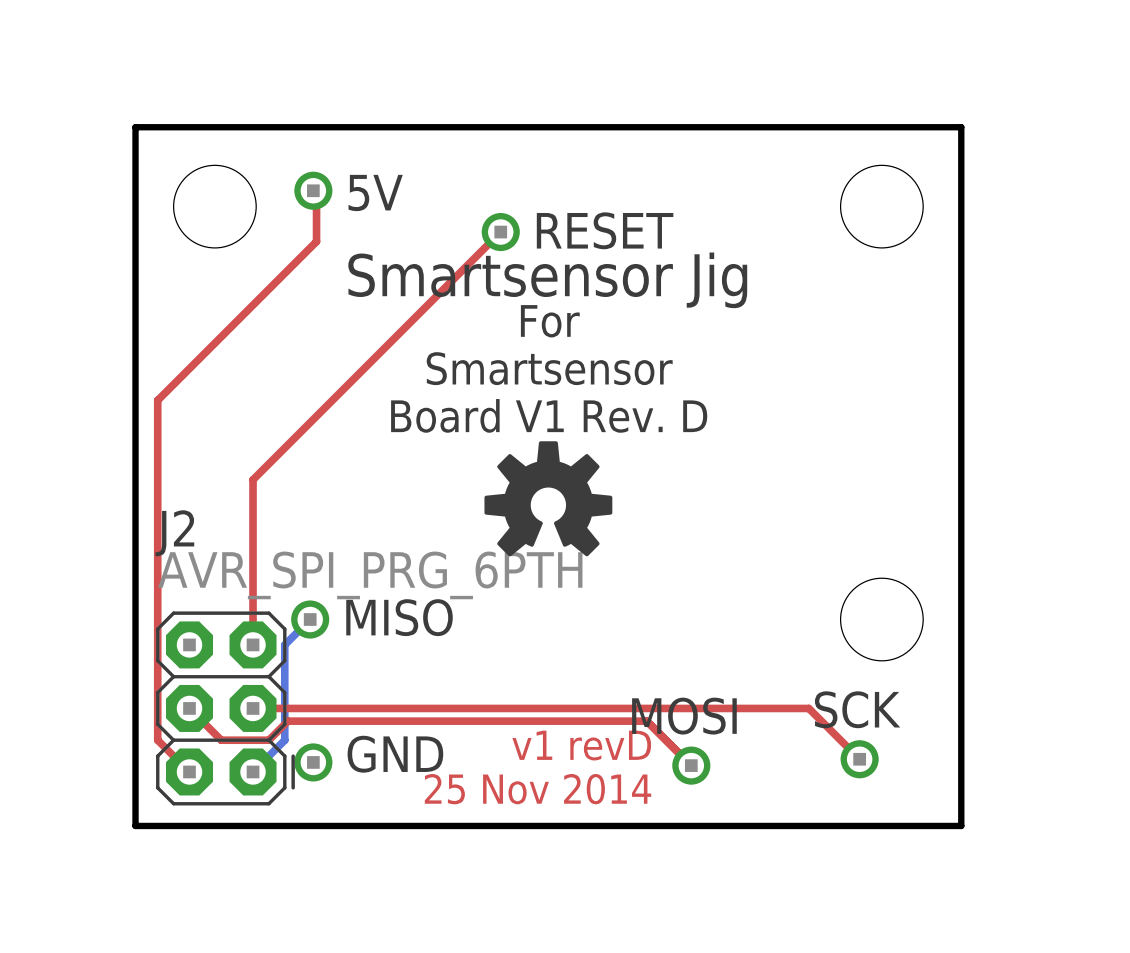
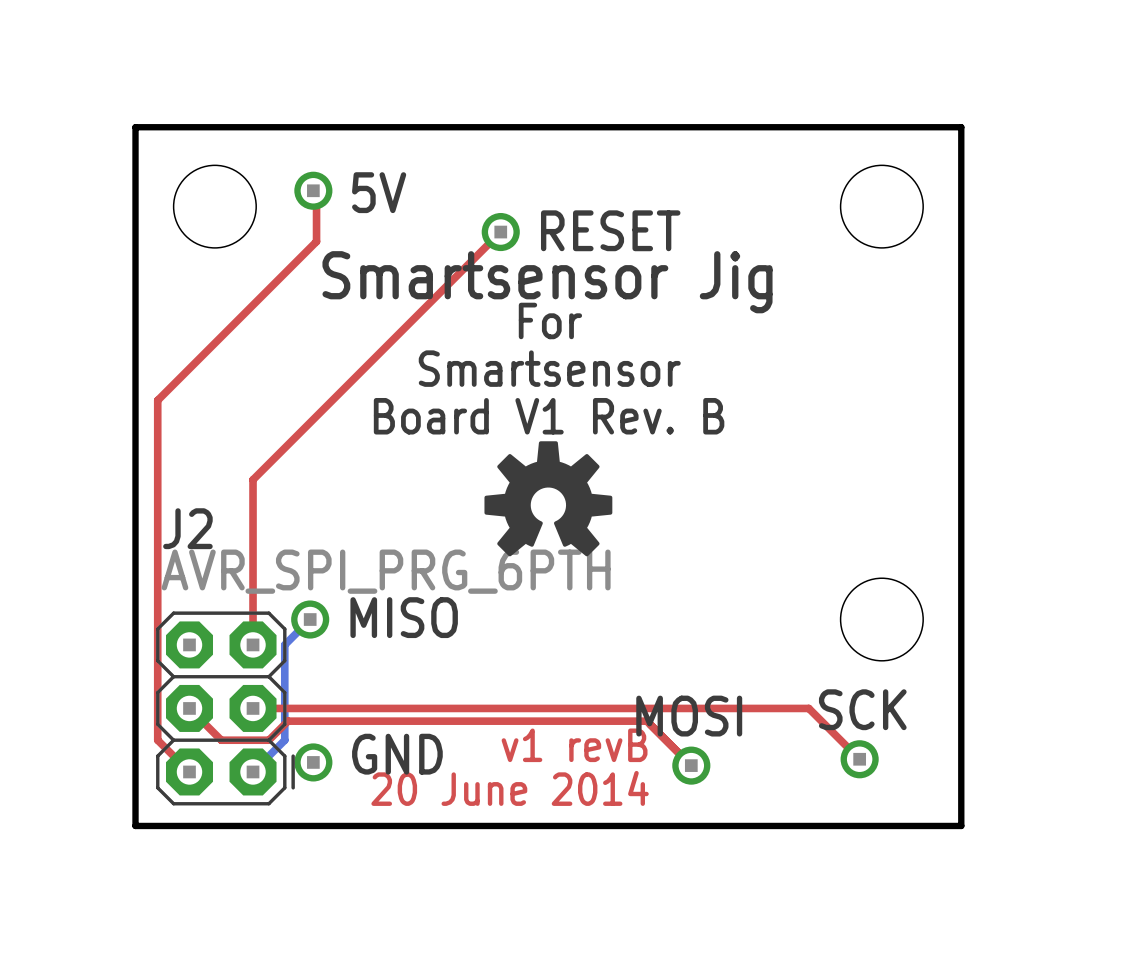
text: Board V1 Rev. D (549, 415) -> Board V1 Rev. B (549, 416)
text: v1 revD (581, 745) -> v1 revB (574, 745)
text: 25 Nov 2014 (538, 789) -> 20 June 2014 (510, 788)

